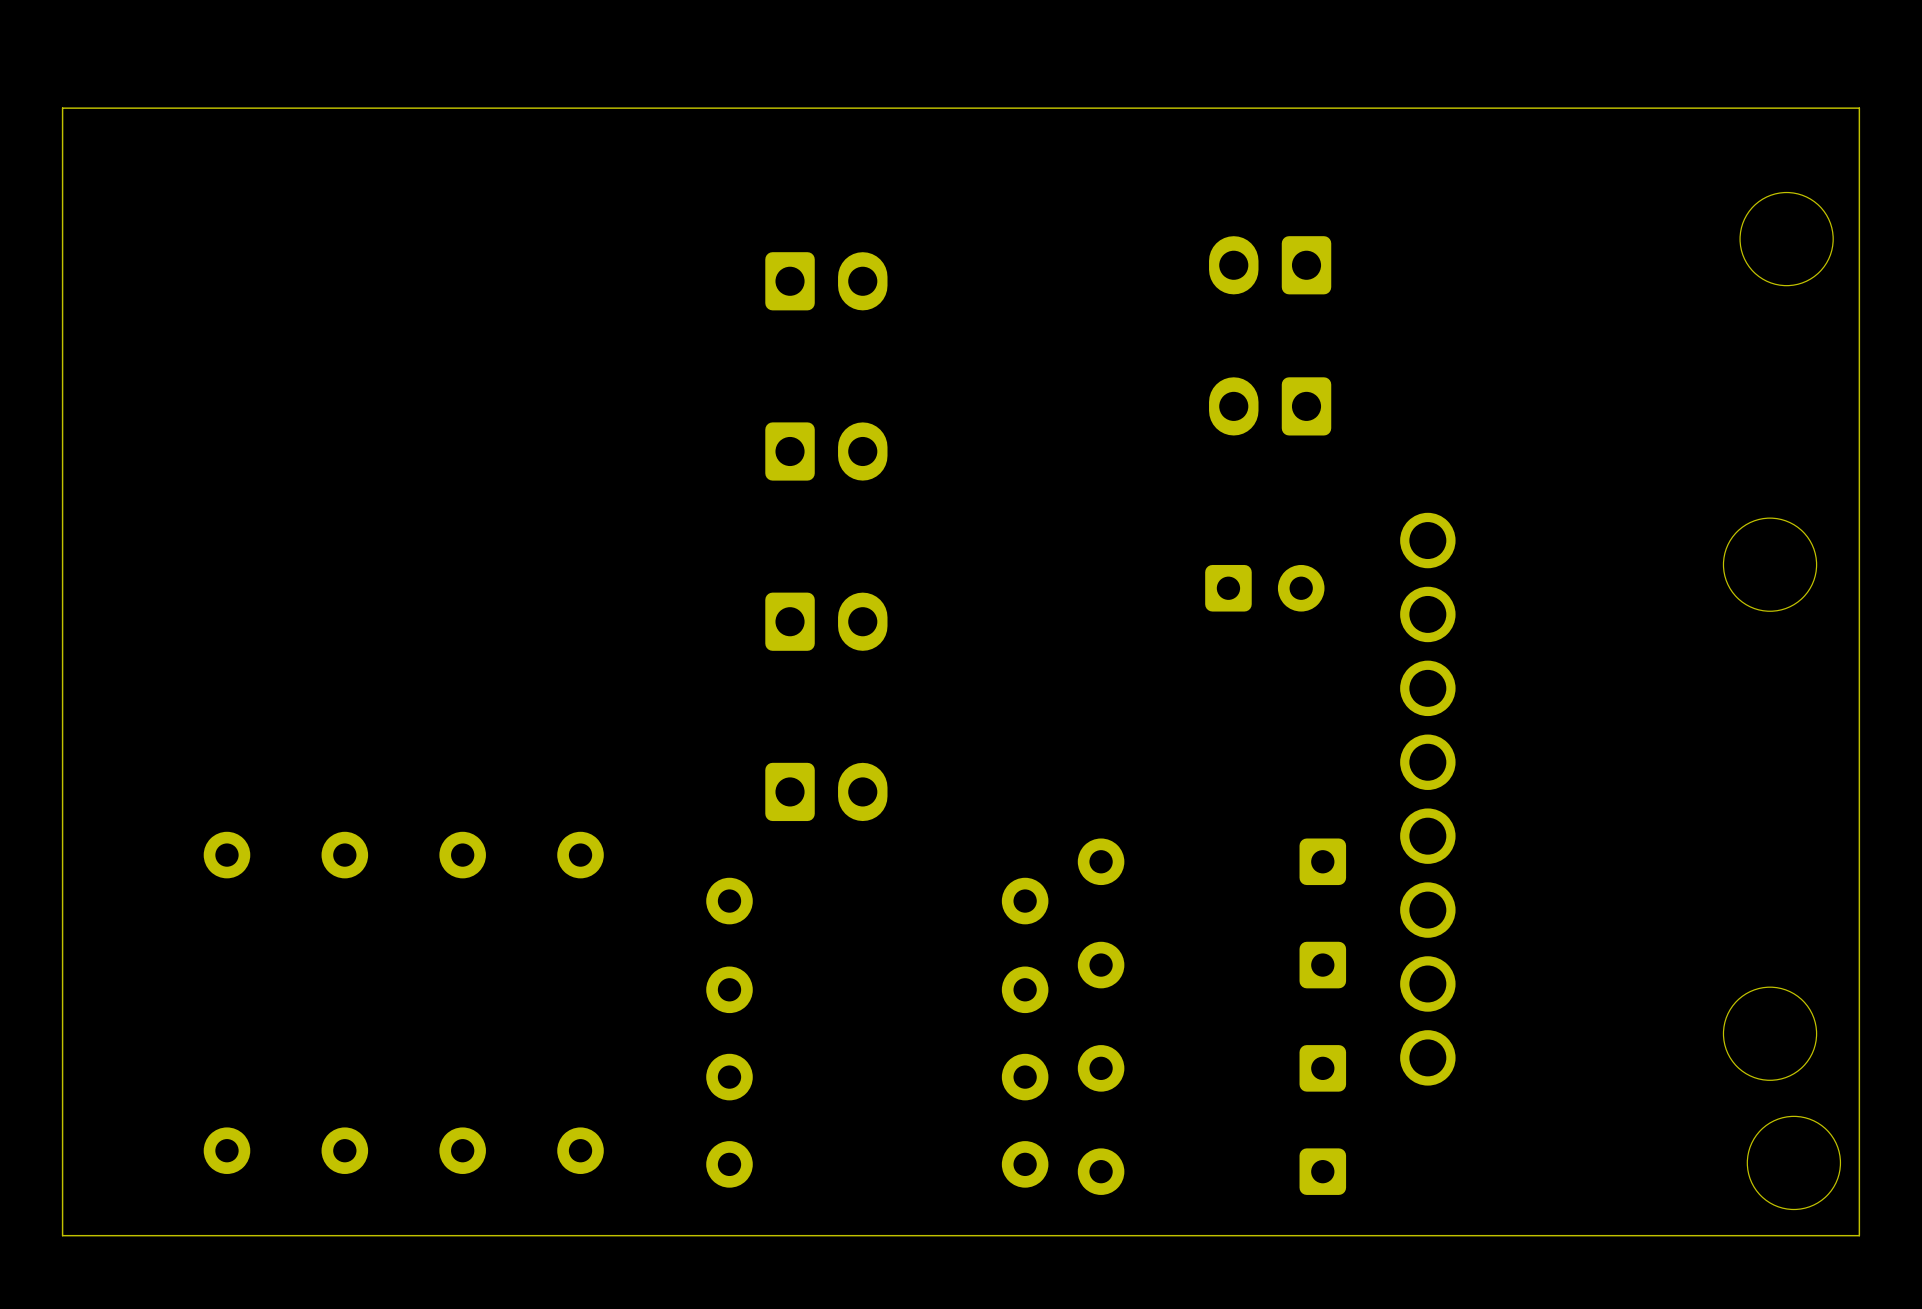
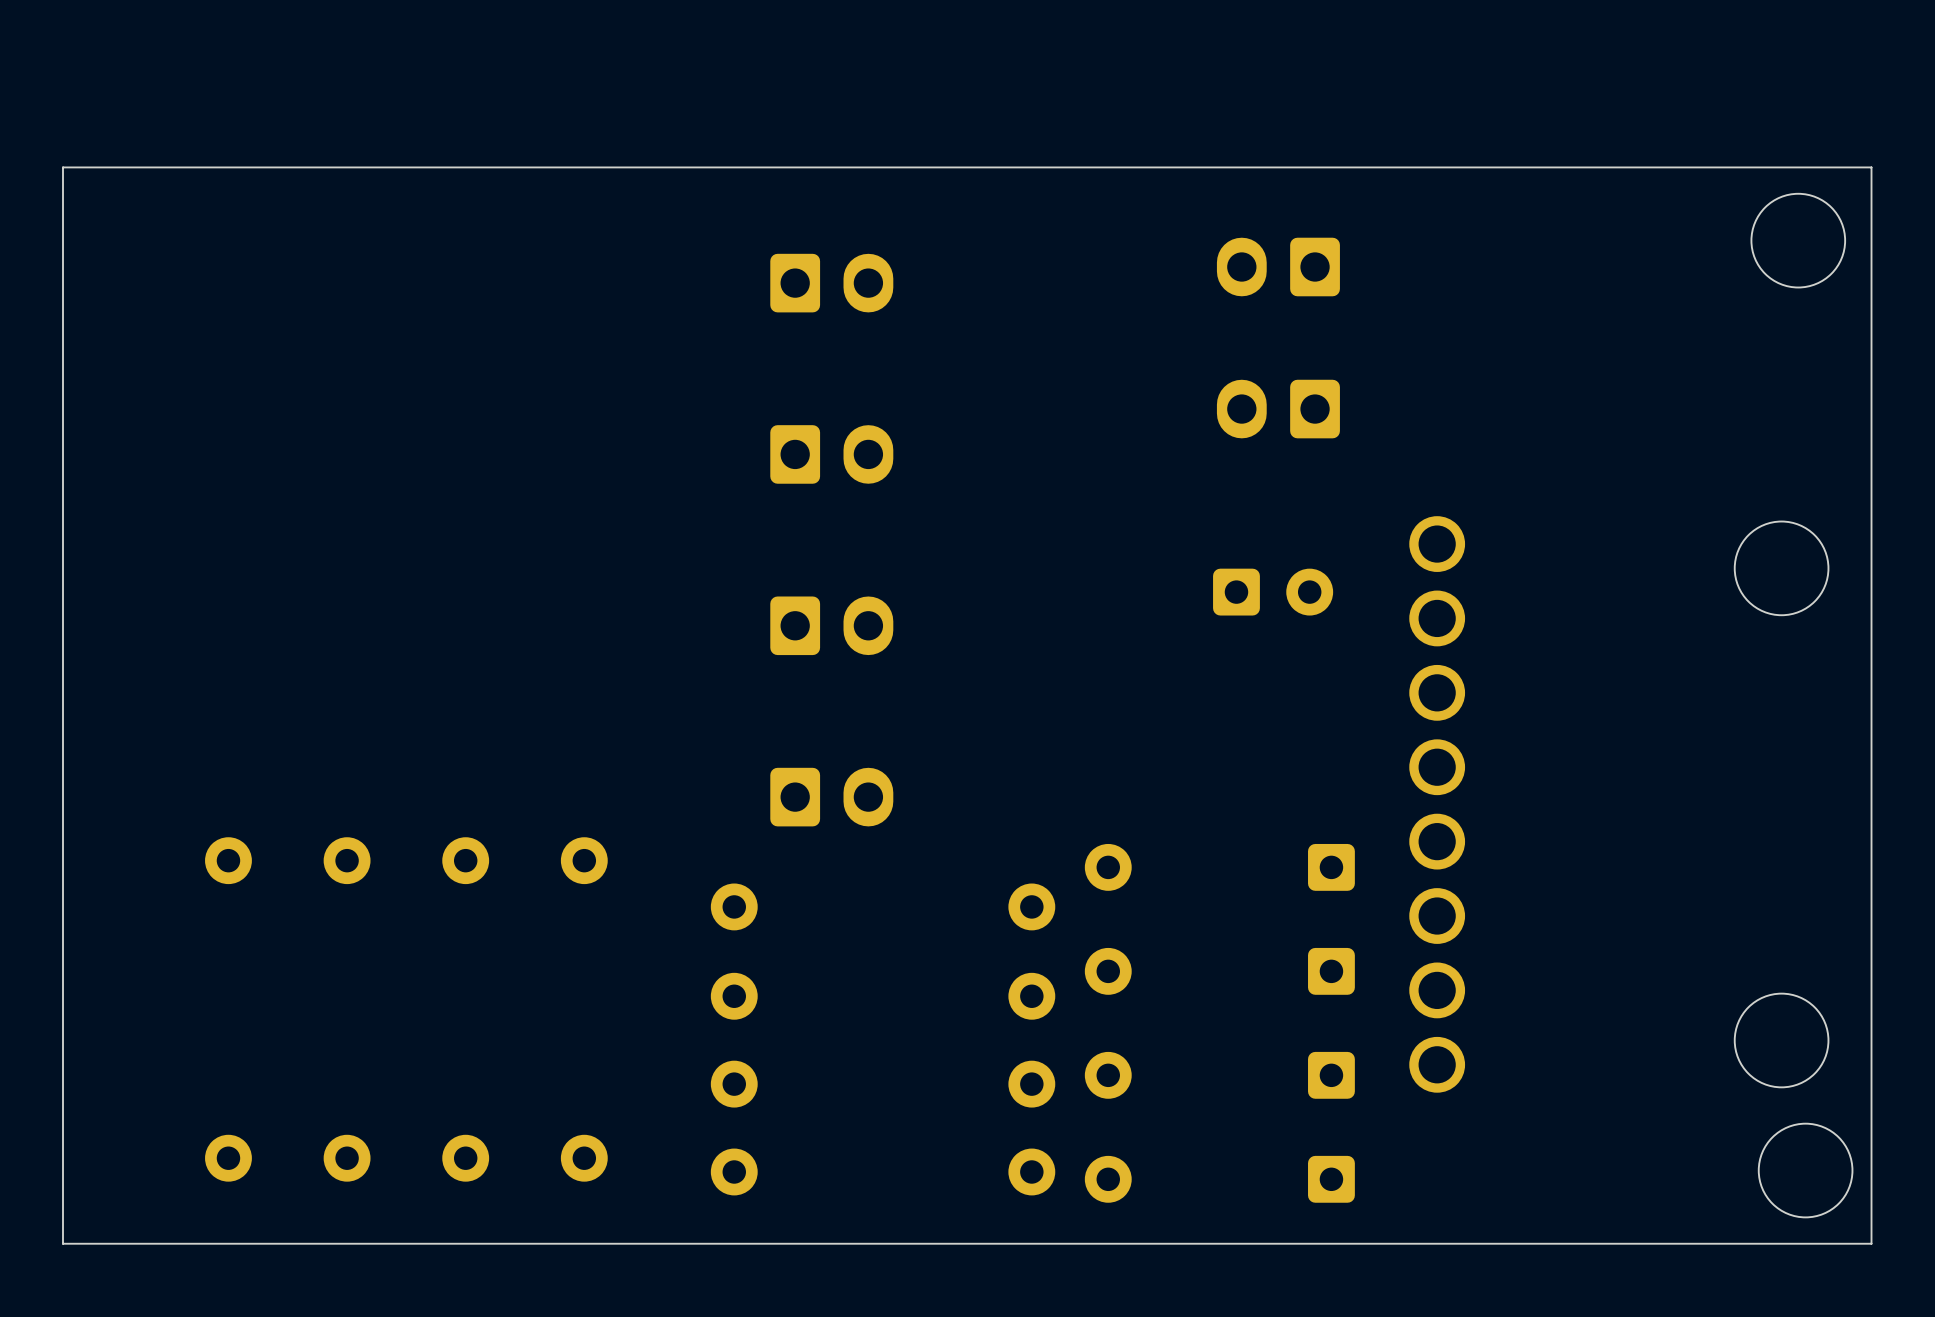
board edge: (1859, 166) (1859, 108) (62, 108) (62, 166) -> (1871, 167) (62, 167)

